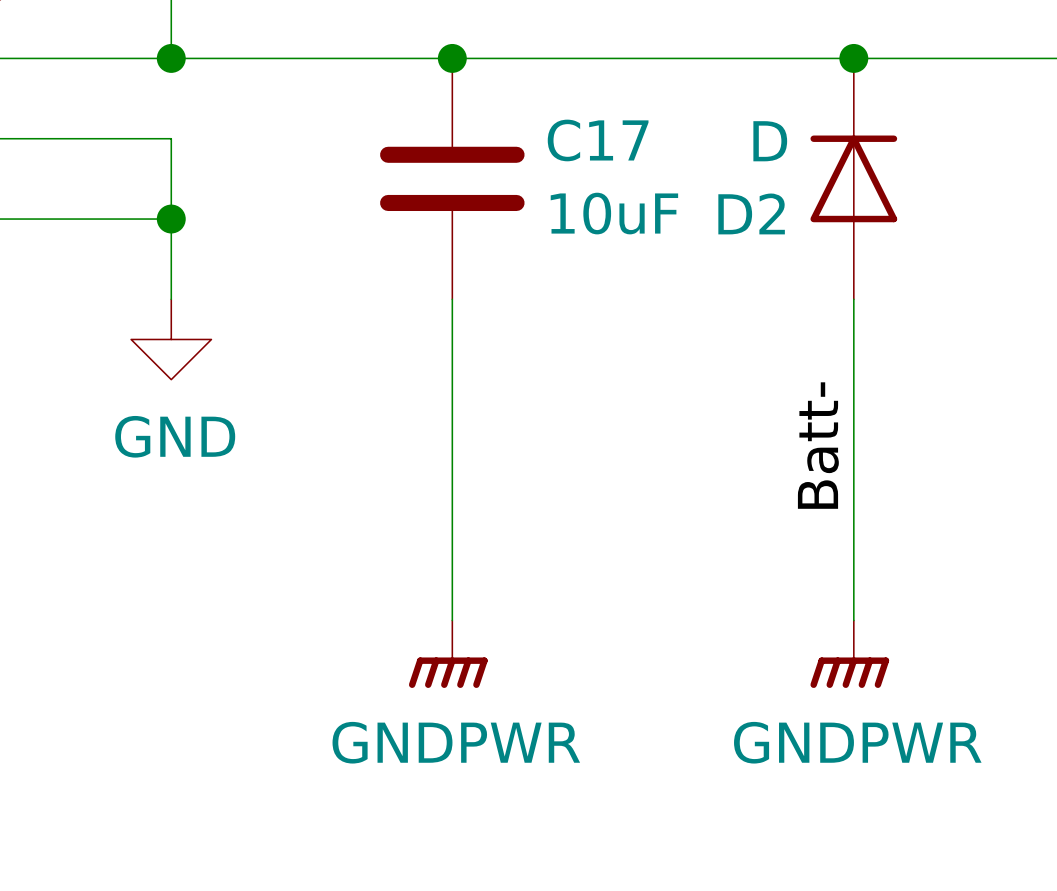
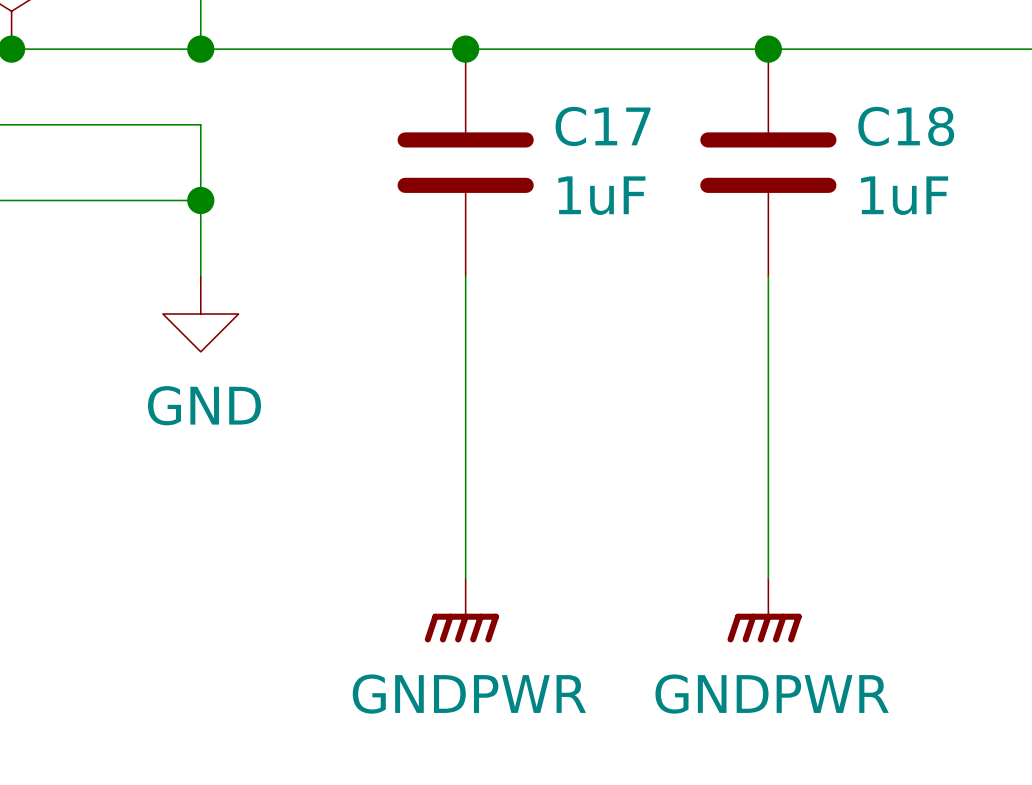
junction position: (853, 58) -> (768, 49)
C18: none -> 1uF (768, 162)
D2: D (853, 178) -> none
C17 value: 10uF (614, 213) -> 1uF (601, 195)
wire: (853, 299) (853, 620) -> (768, 276) (768, 578)
label: Batt- (818, 445) -> none
power symbol position: GNDPWR (849, 654) -> GNDPWR (764, 610)

